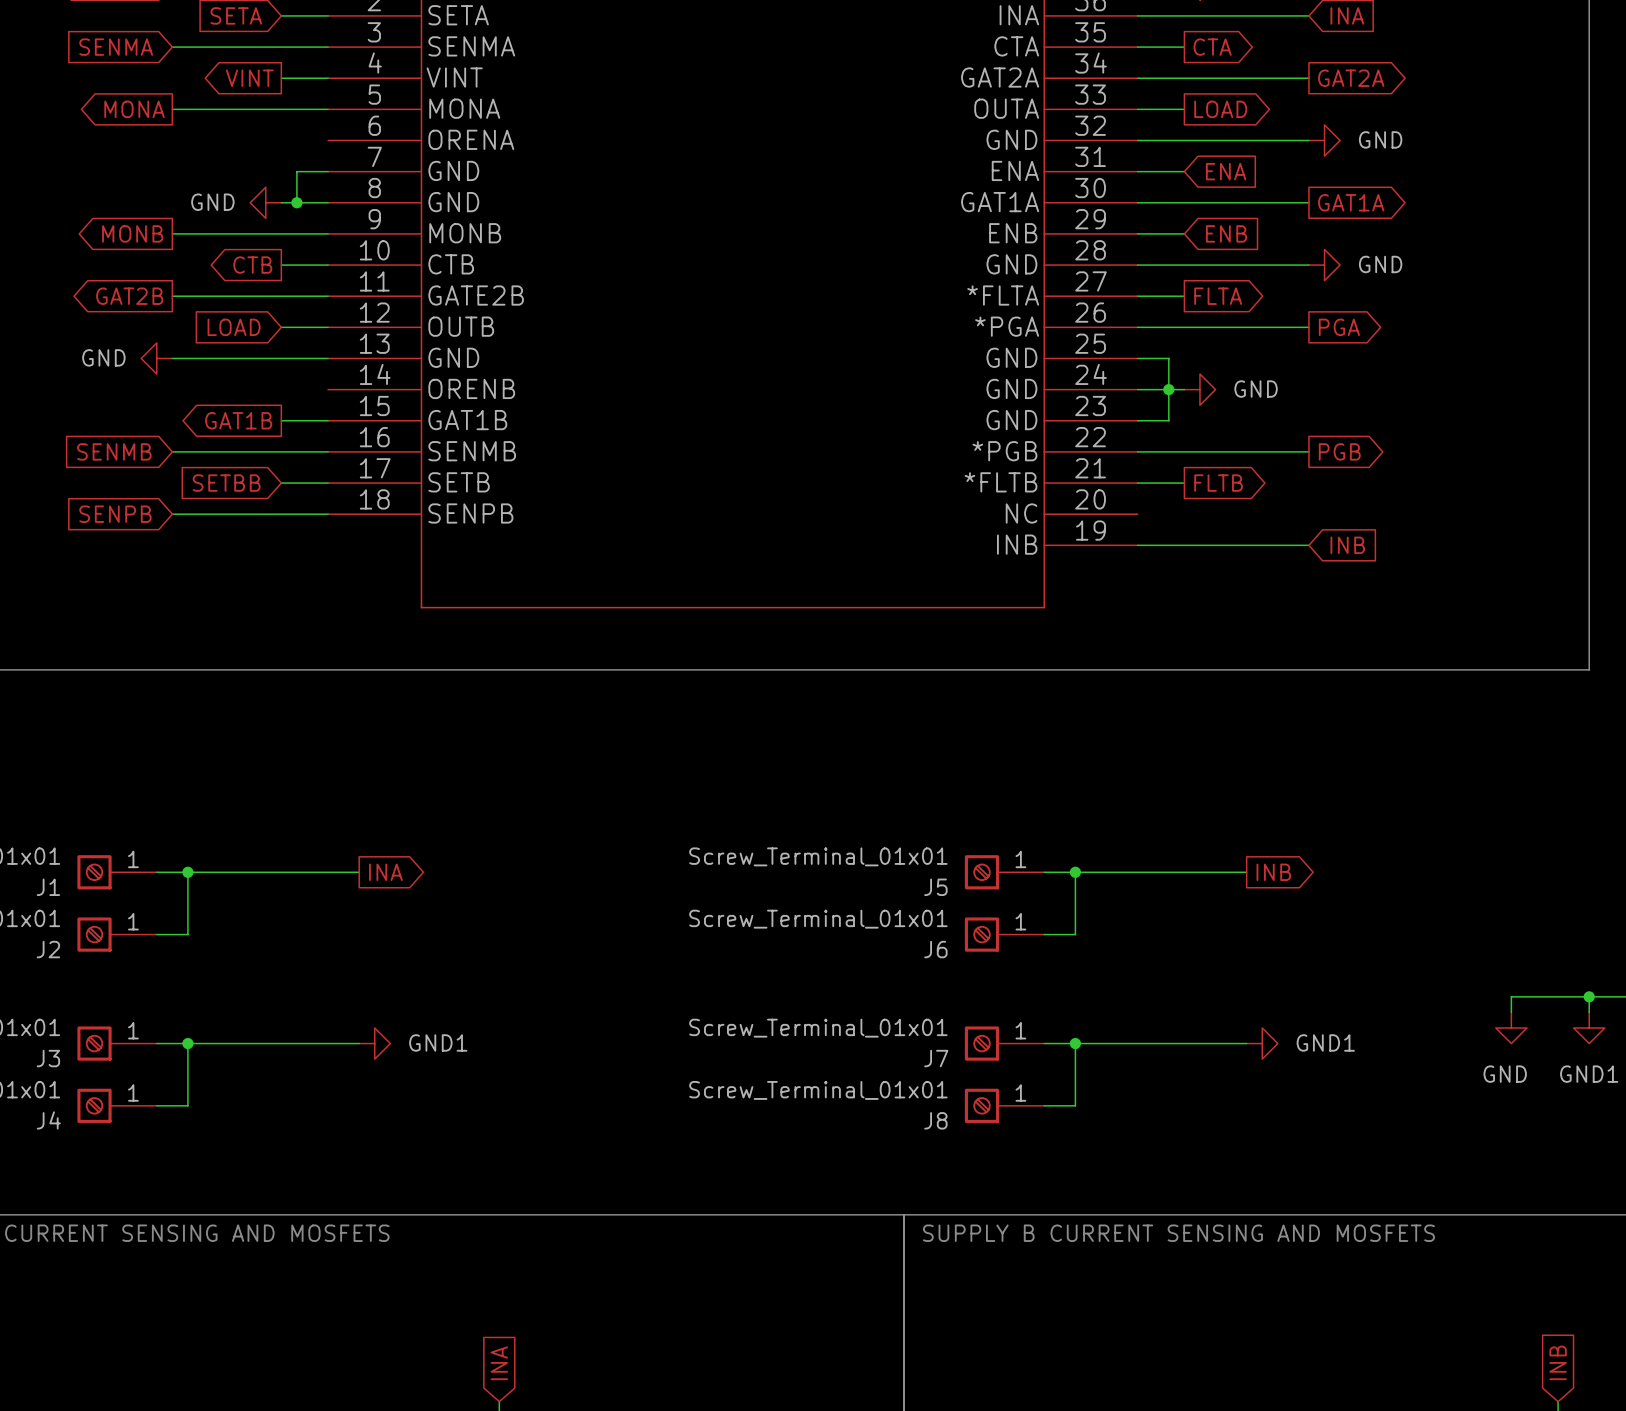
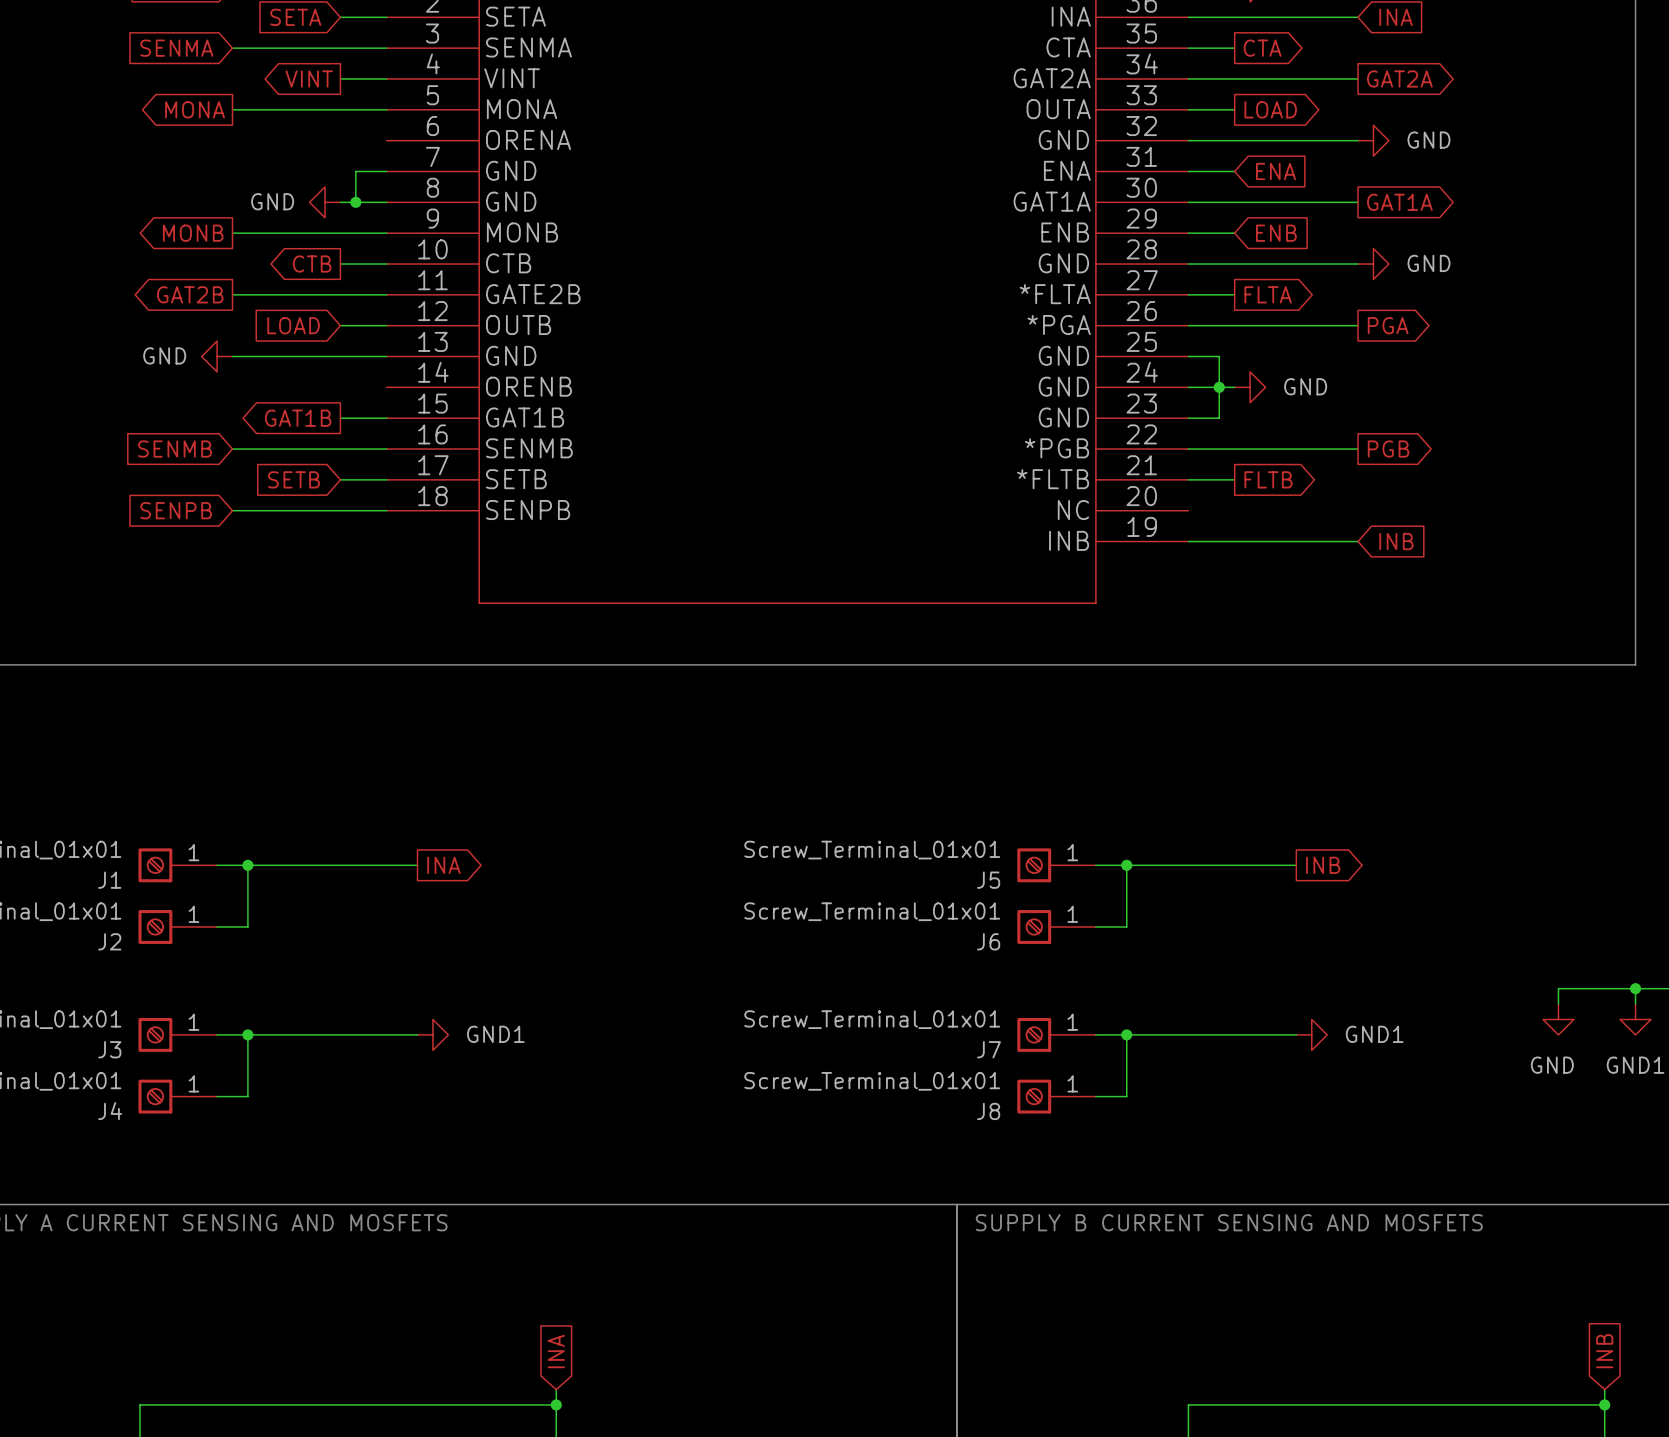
global label: SETBB (226, 483) -> SETB (293, 479)

